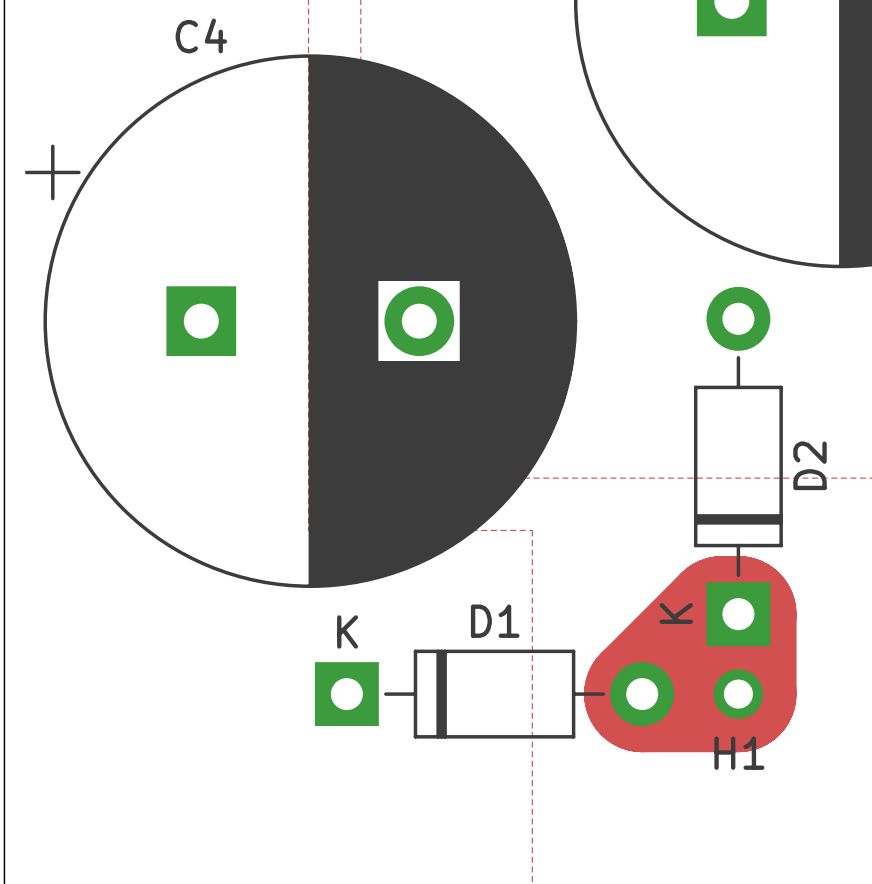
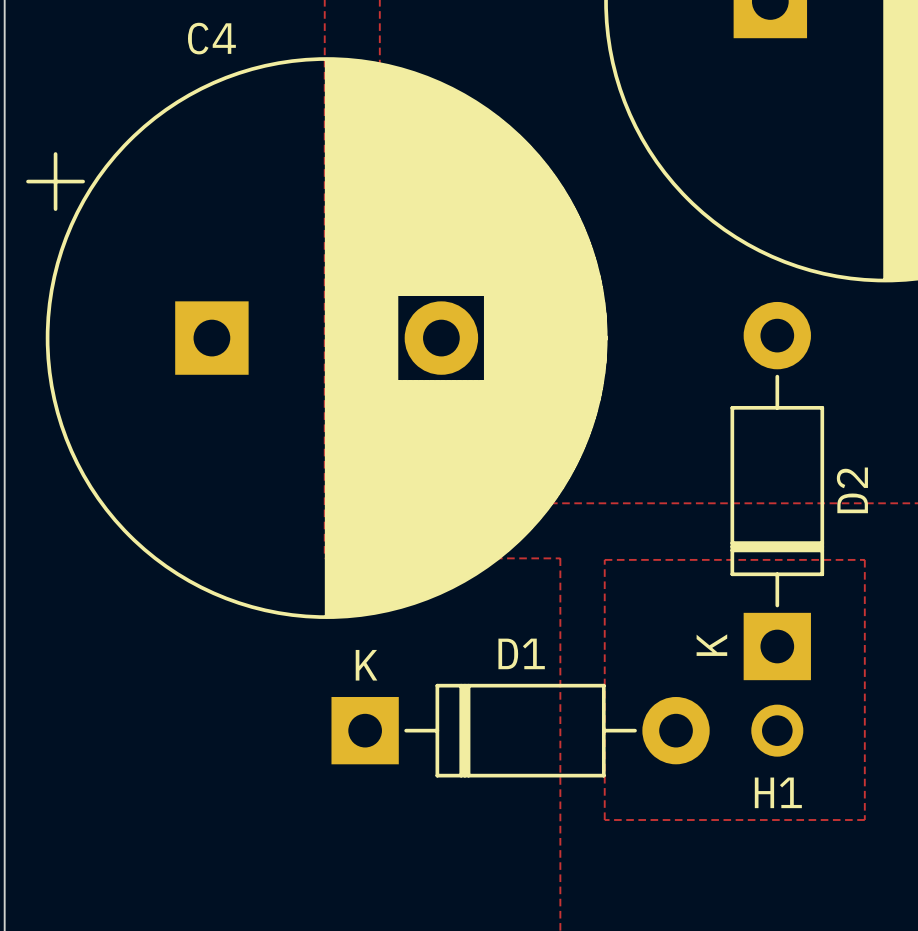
top zone outline: none -> (604, 559) (864, 559) (864, 820) (604, 820) (604, 559)
top track: (722, 614) (642, 694) (738, 694) (738, 614) (722, 614) -> none

